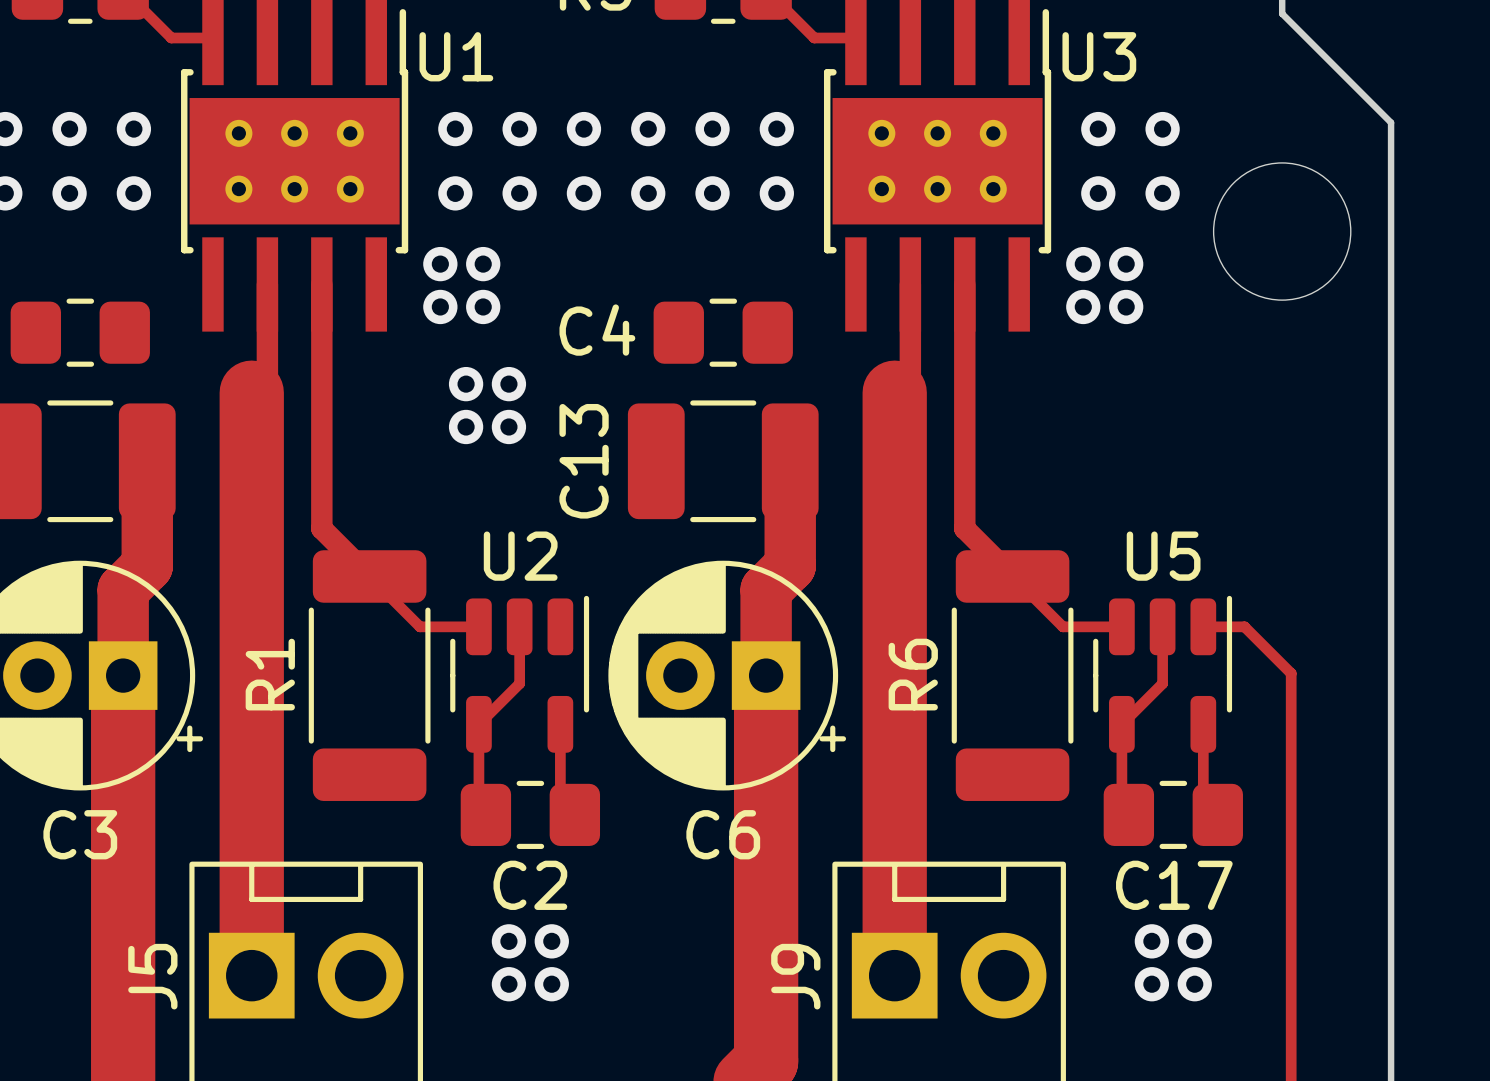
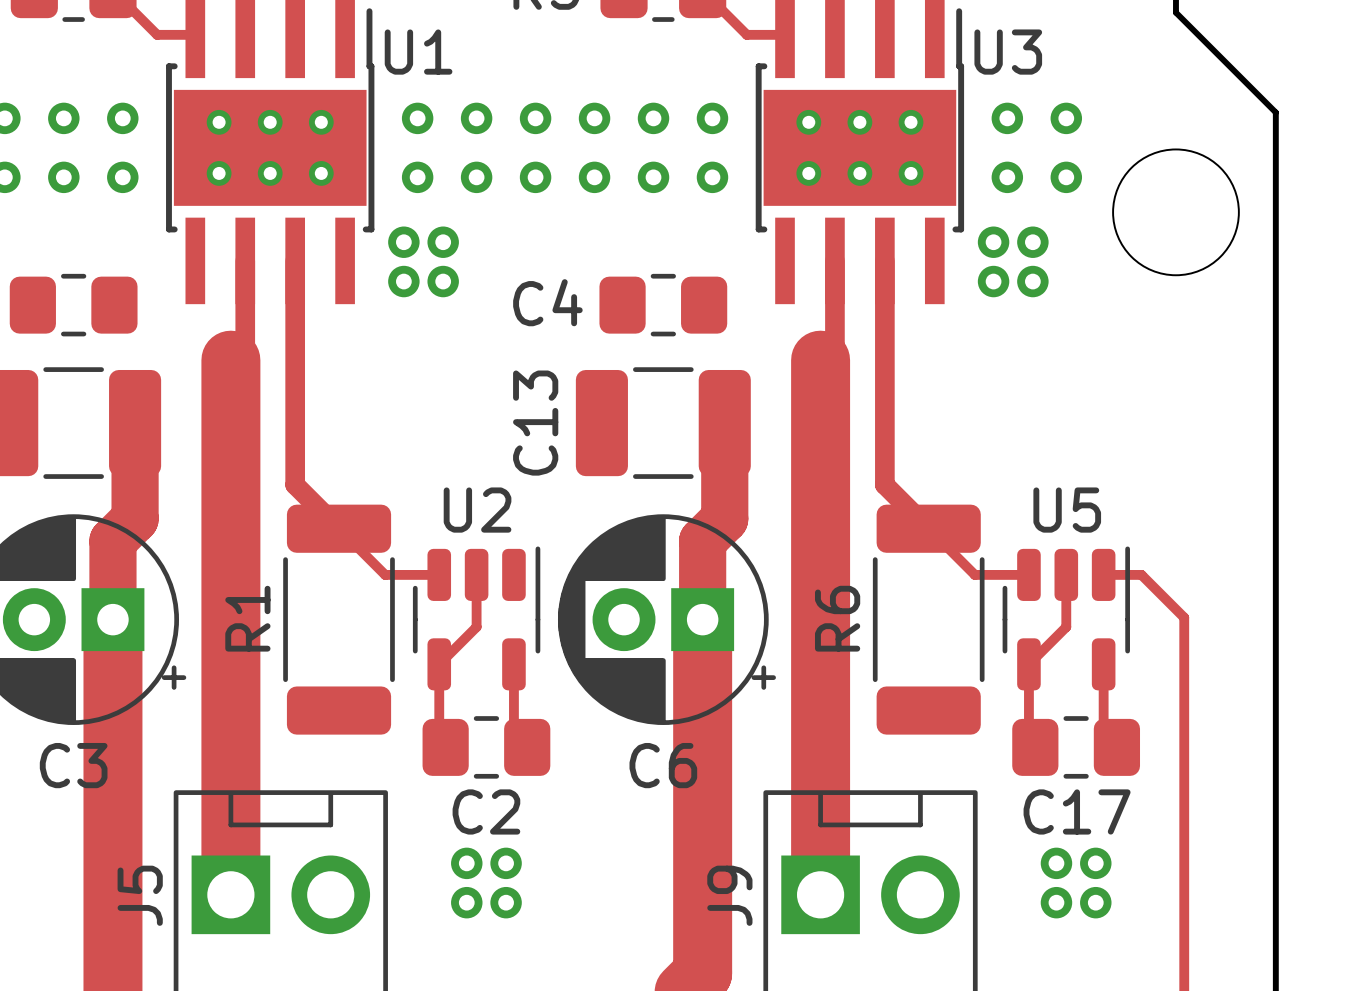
via: (466, 384) -> none
via: (508, 384) -> none
via: (466, 426) -> none
via: (508, 426) -> none

